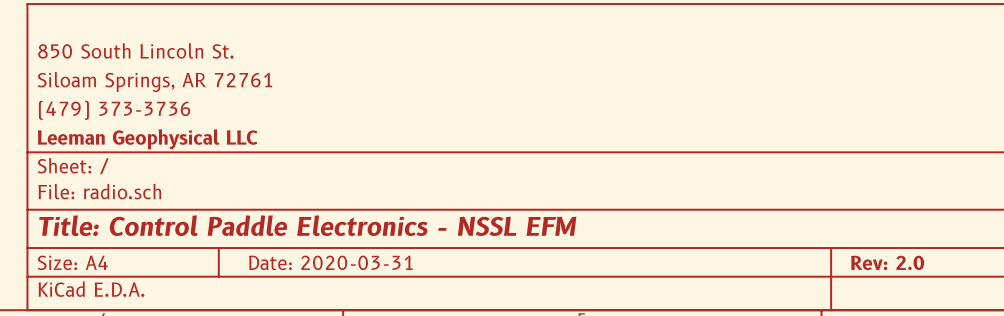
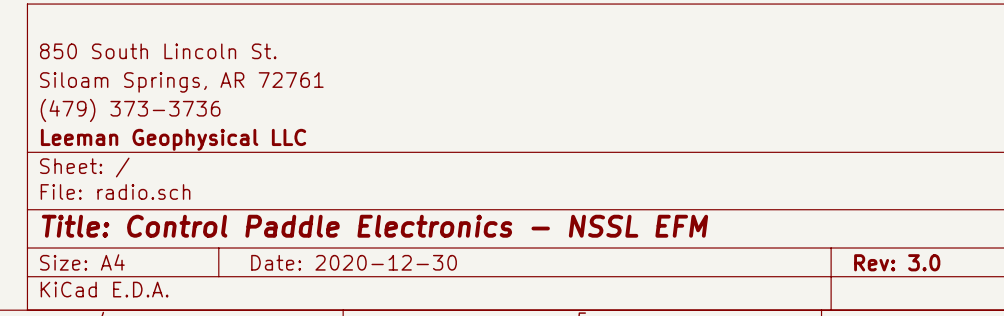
title block: Date: 2020-03-31 (330, 262) -> Date: 2020-12-30 (354, 262)
title block: Rev: 2.0 (887, 262) -> Rev: 3.0 (897, 262)

